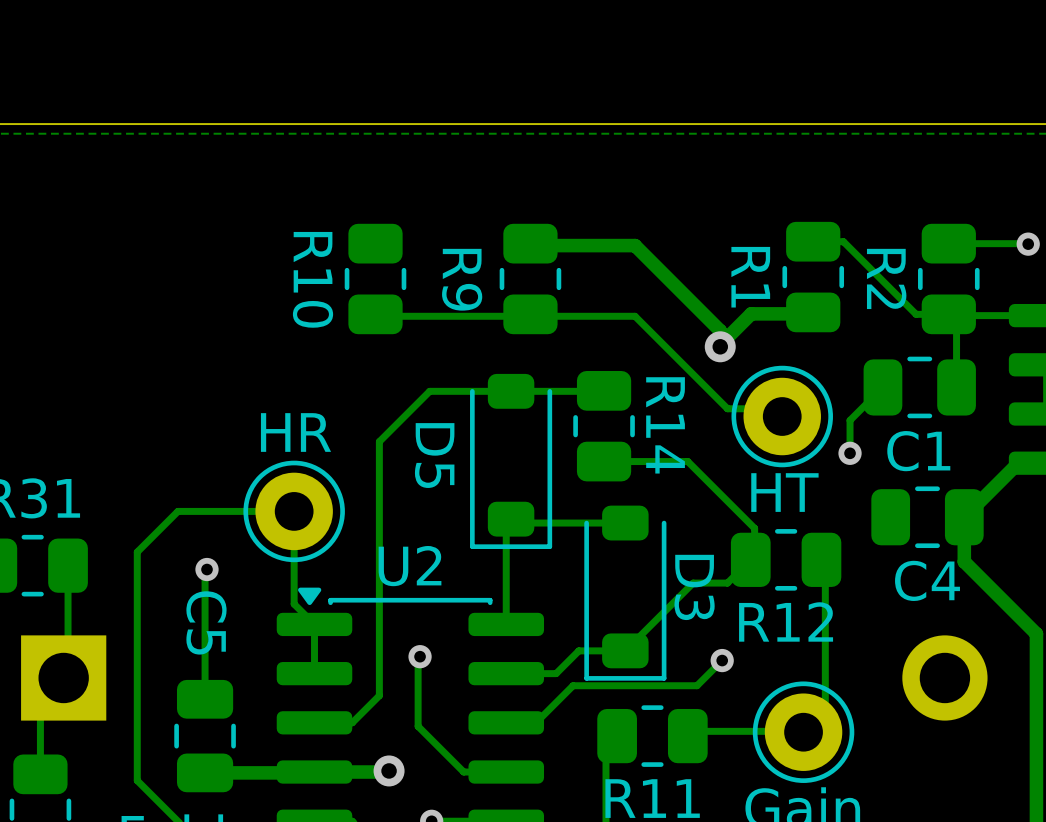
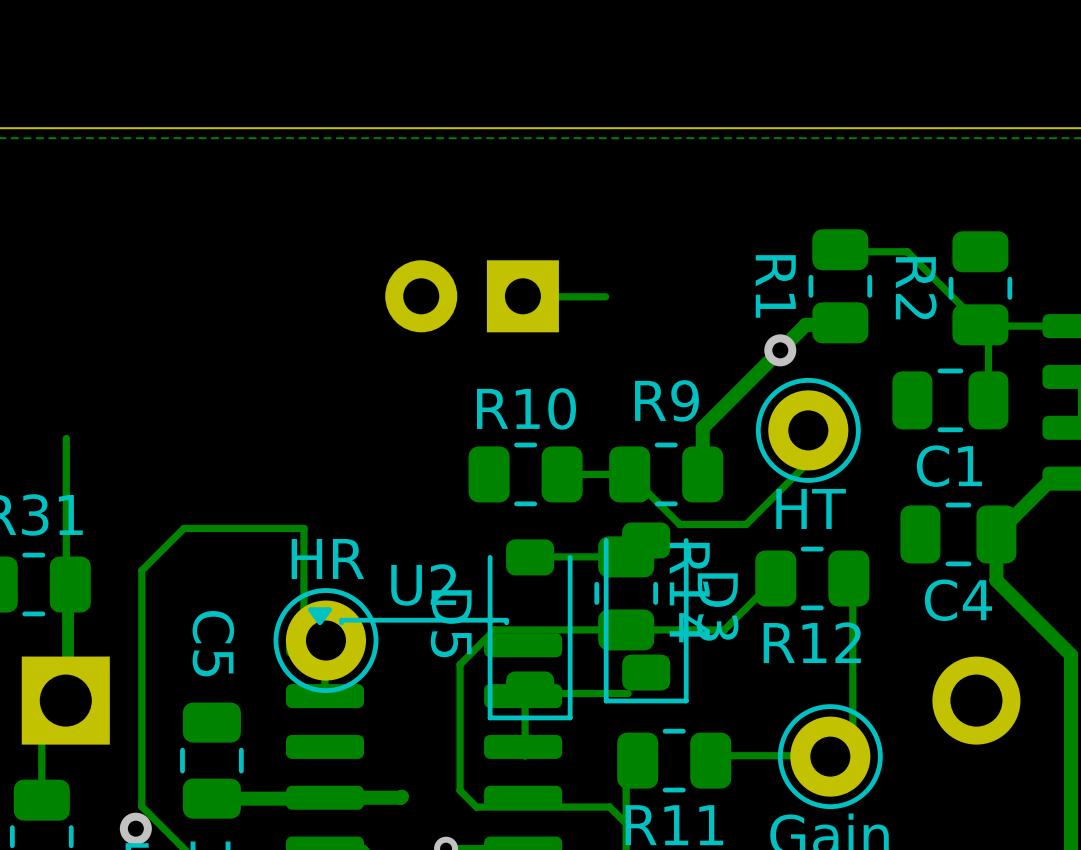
track: (813, 241) (843, 241) (916, 314) (948, 314) -> (850, 251) (907, 251) (980, 324)
track: (530, 243) (532, 245) (635, 245) (720, 330) (720, 346) -> none
track: (1027, 243) (948, 243) -> (605, 296) (523, 296)
via: (1028, 244) -> none
R10 rotation: 0° (375, 279) -> 90° clockwise (525, 474)
R10 position: (375, 279) -> (525, 474)
R9 rotation: 0° (530, 279) -> 90° clockwise (666, 474)
R9 position: (530, 279) -> (666, 474)
part: none -> (472, 296)
track: (813, 312) (751, 313) (720, 344) -> none
track: (375, 314) (377, 316) (528, 316) (530, 314) (532, 316) (635, 316) (727, 408) (774, 408) (782, 416) -> (562, 474) (629, 474) (679, 524) (746, 524) (808, 462) (808, 430)
track: none -> (850, 324) (805, 324) (702, 427) (702, 474)
via position: (720, 346) -> (780, 350)
track: (882, 387) (850, 420) (850, 453) -> none
track: (603, 391) (429, 391) (379, 441) (379, 695) (352, 722) (314, 722) -> none
track: none -> (66, 438) (66, 580) (70, 584) (65, 589) (65, 700)
R14 position: (604, 426) -> (626, 593)
via: (850, 453) -> none
D5 position: (511, 461) -> (530, 629)
track: (604, 461) (687, 461) (754, 528) (754, 555) (750, 559) -> none
part position: (294, 511) -> (325, 640)
track: (625, 523) (514, 523) (511, 519) (506, 524) (506, 624) -> none
track: none -> (626, 556) (530, 556)
track: (207, 569) (205, 571) (205, 699) -> none
via: (207, 569) -> none
track: (727, 583) (693, 583) (625, 650) (578, 650) (556, 673) (506, 673) -> (751, 602) (724, 629) (494, 629) (460, 664) (460, 790) (476, 807) (609, 807) (628, 825)
track: (420, 656) (418, 658) (418, 726) (463, 772) (506, 772) -> none
via: (420, 656) -> none
track: (722, 660) (697, 685) (573, 685) (535, 722) (506, 722) -> none
via: (722, 660) -> none
track: none -> (628, 693) (534, 693) (530, 689) (525, 694) (525, 756)
via: (389, 770) -> none
via: none -> (135, 828)

